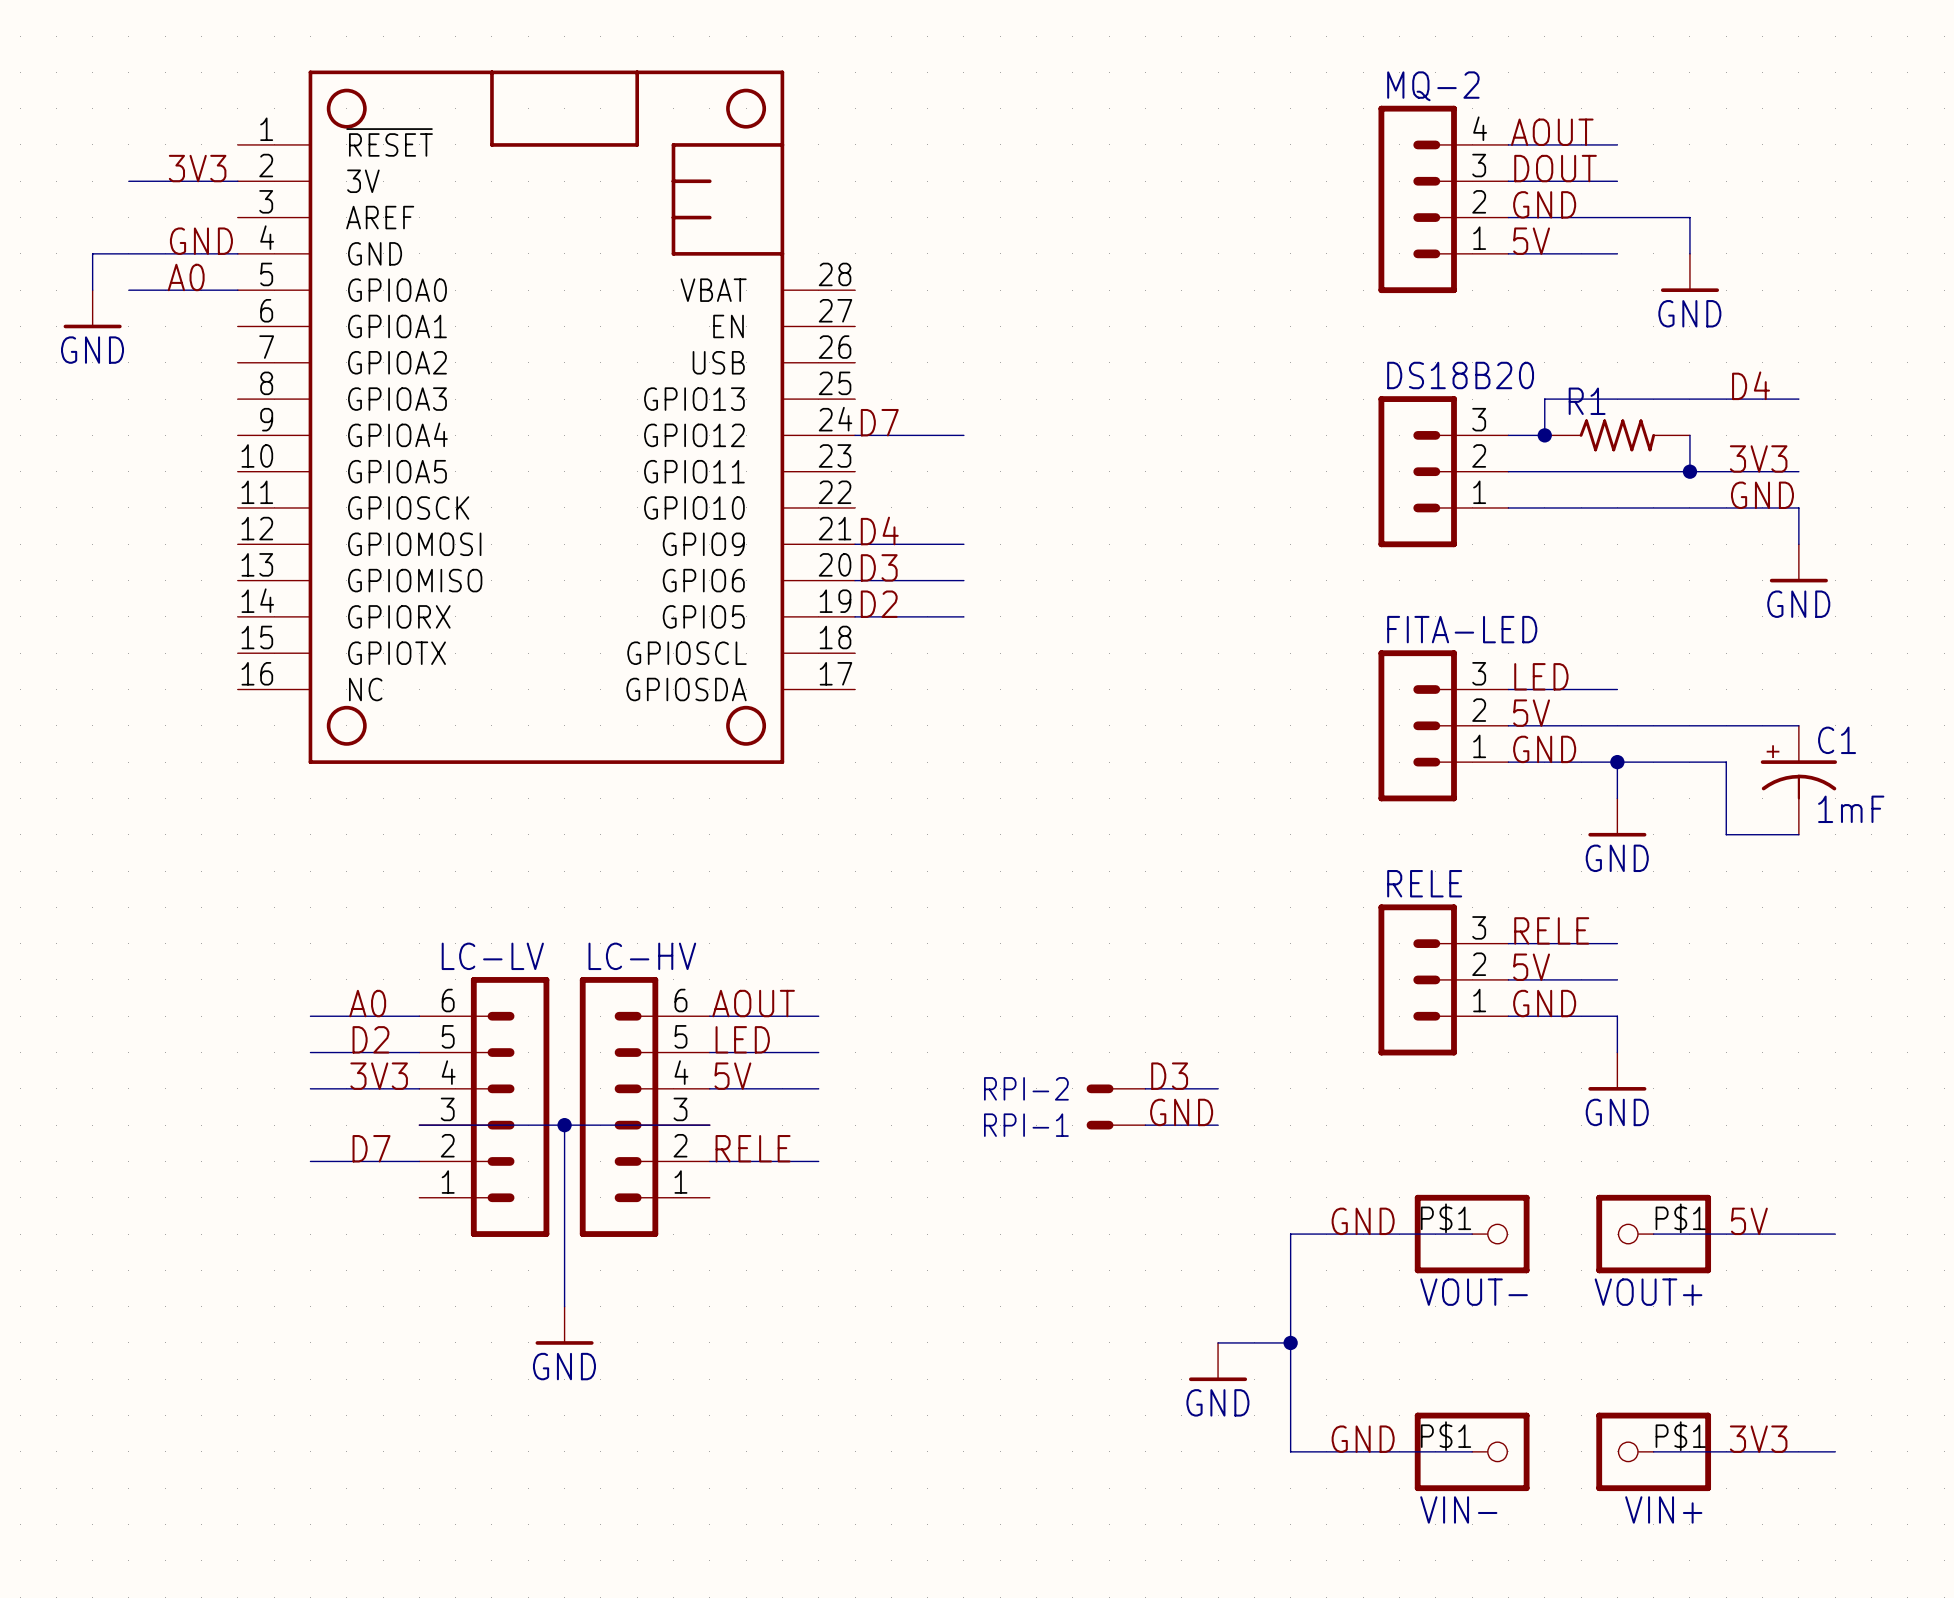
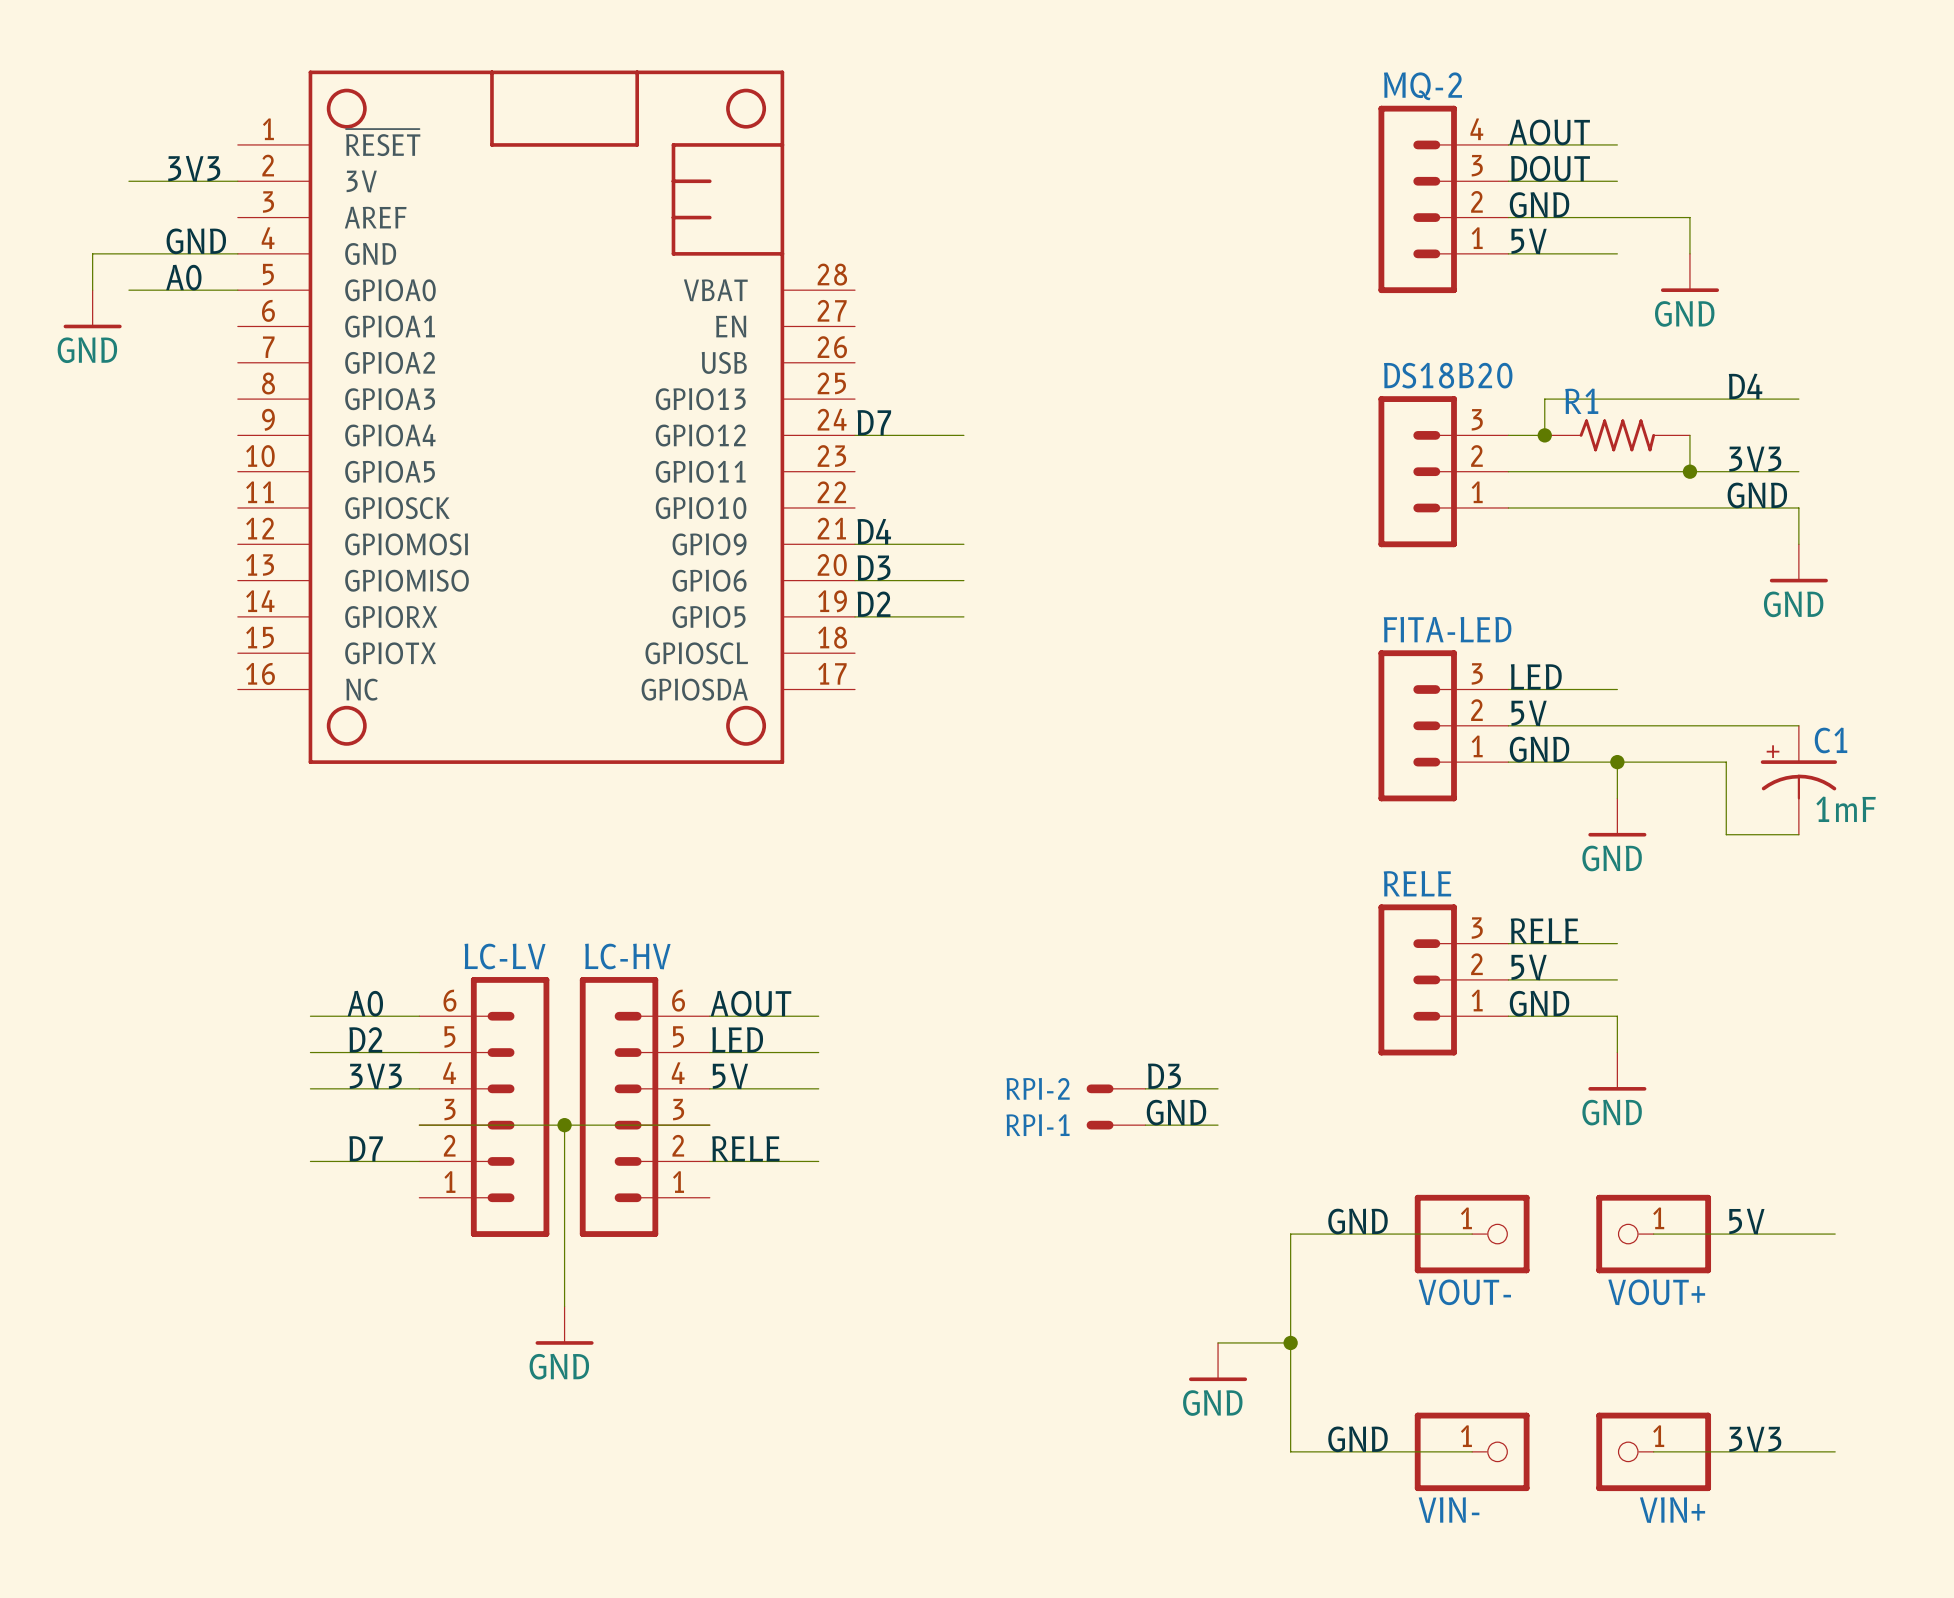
VOUT- pin number: P$1 (1446, 1218) -> 1 (1466, 1218)
VOUT+ pin number: P$1 (1680, 1218) -> 1 (1658, 1218)
VIN- pin number: P$1 (1446, 1436) -> 1 (1466, 1436)
VIN+ pin number: P$1 (1680, 1436) -> 1 (1658, 1436)

